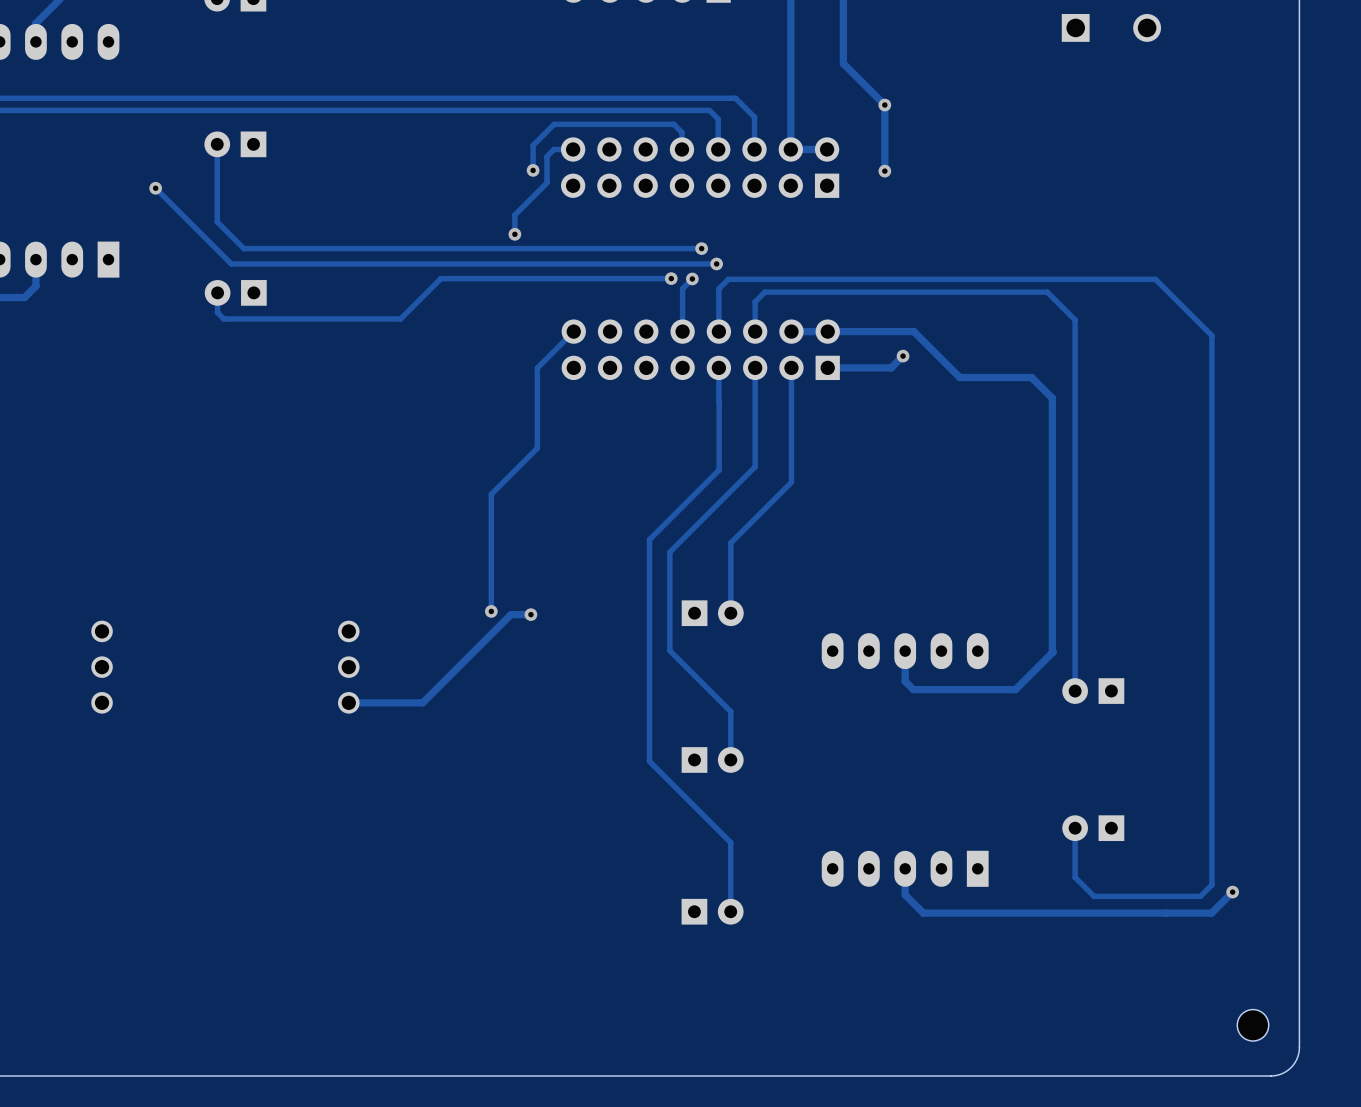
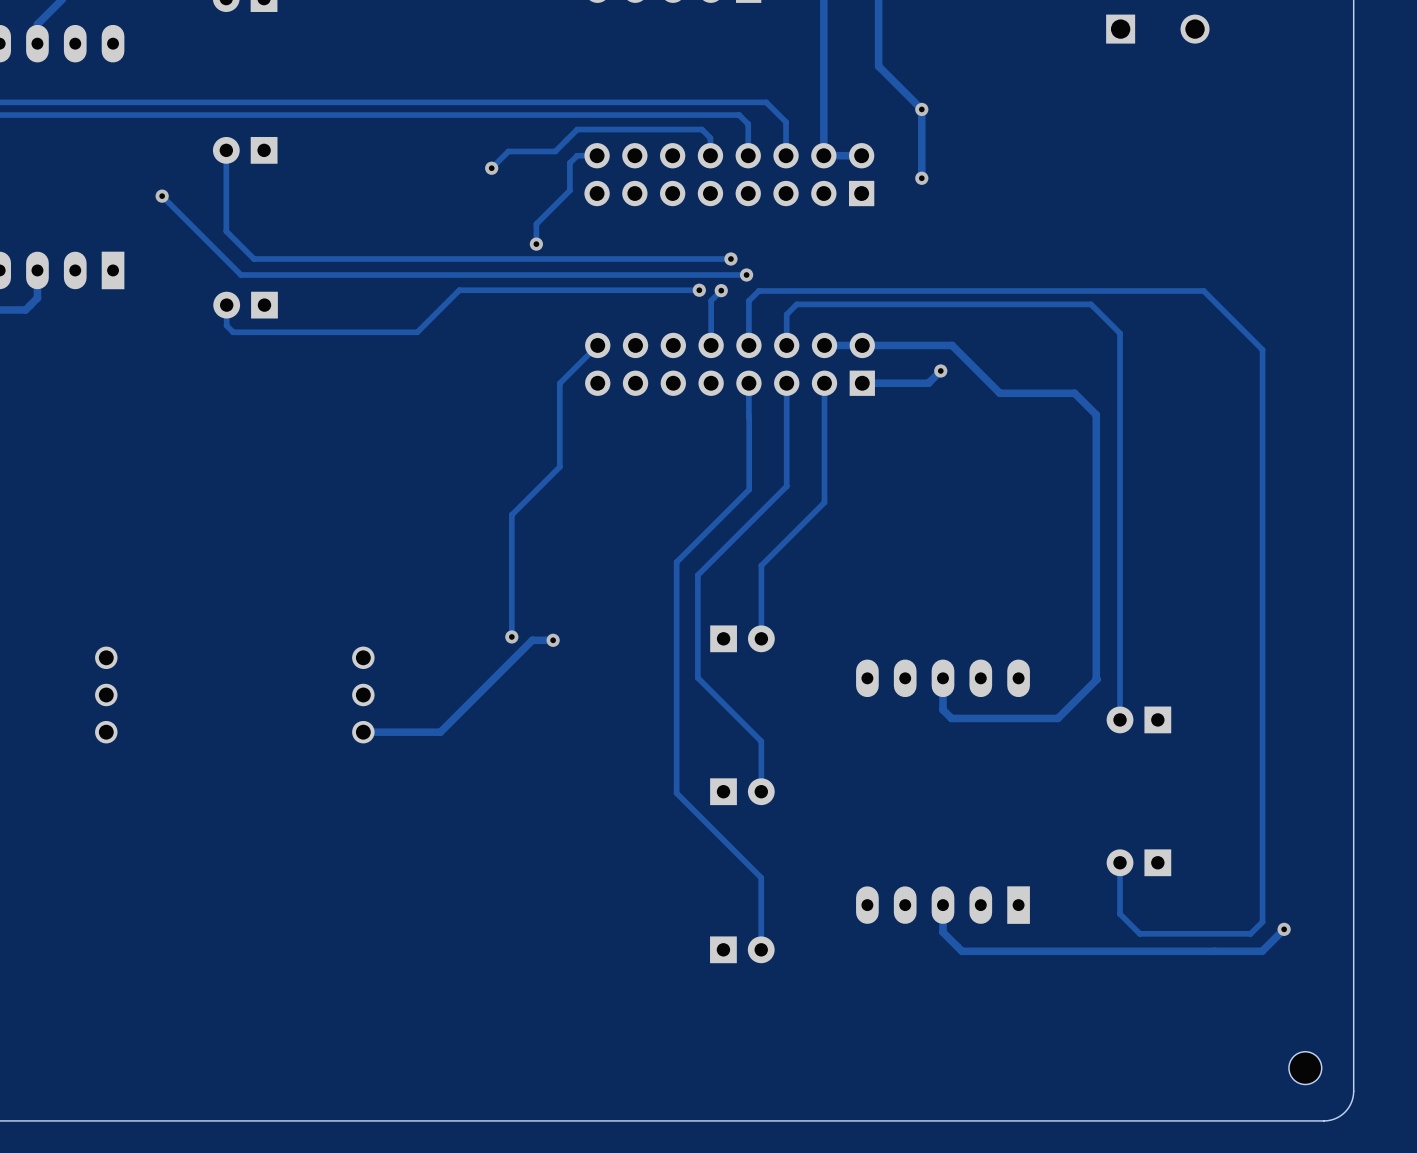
track: (533, 145) (533, 170) -> (555, 151) (508, 151) (491, 168)
via position: (533, 170) -> (491, 168)

